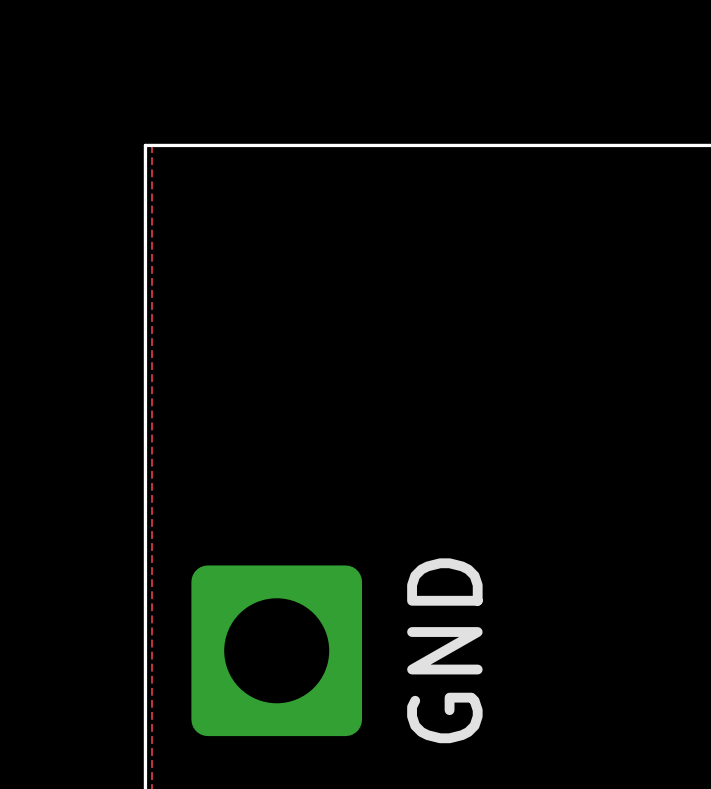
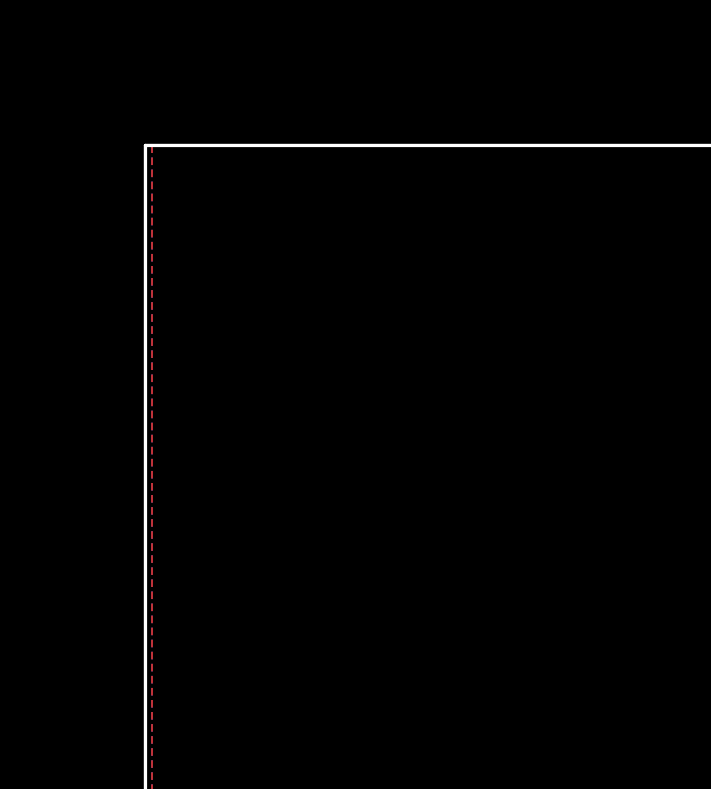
part: GND (276, 650) -> none

